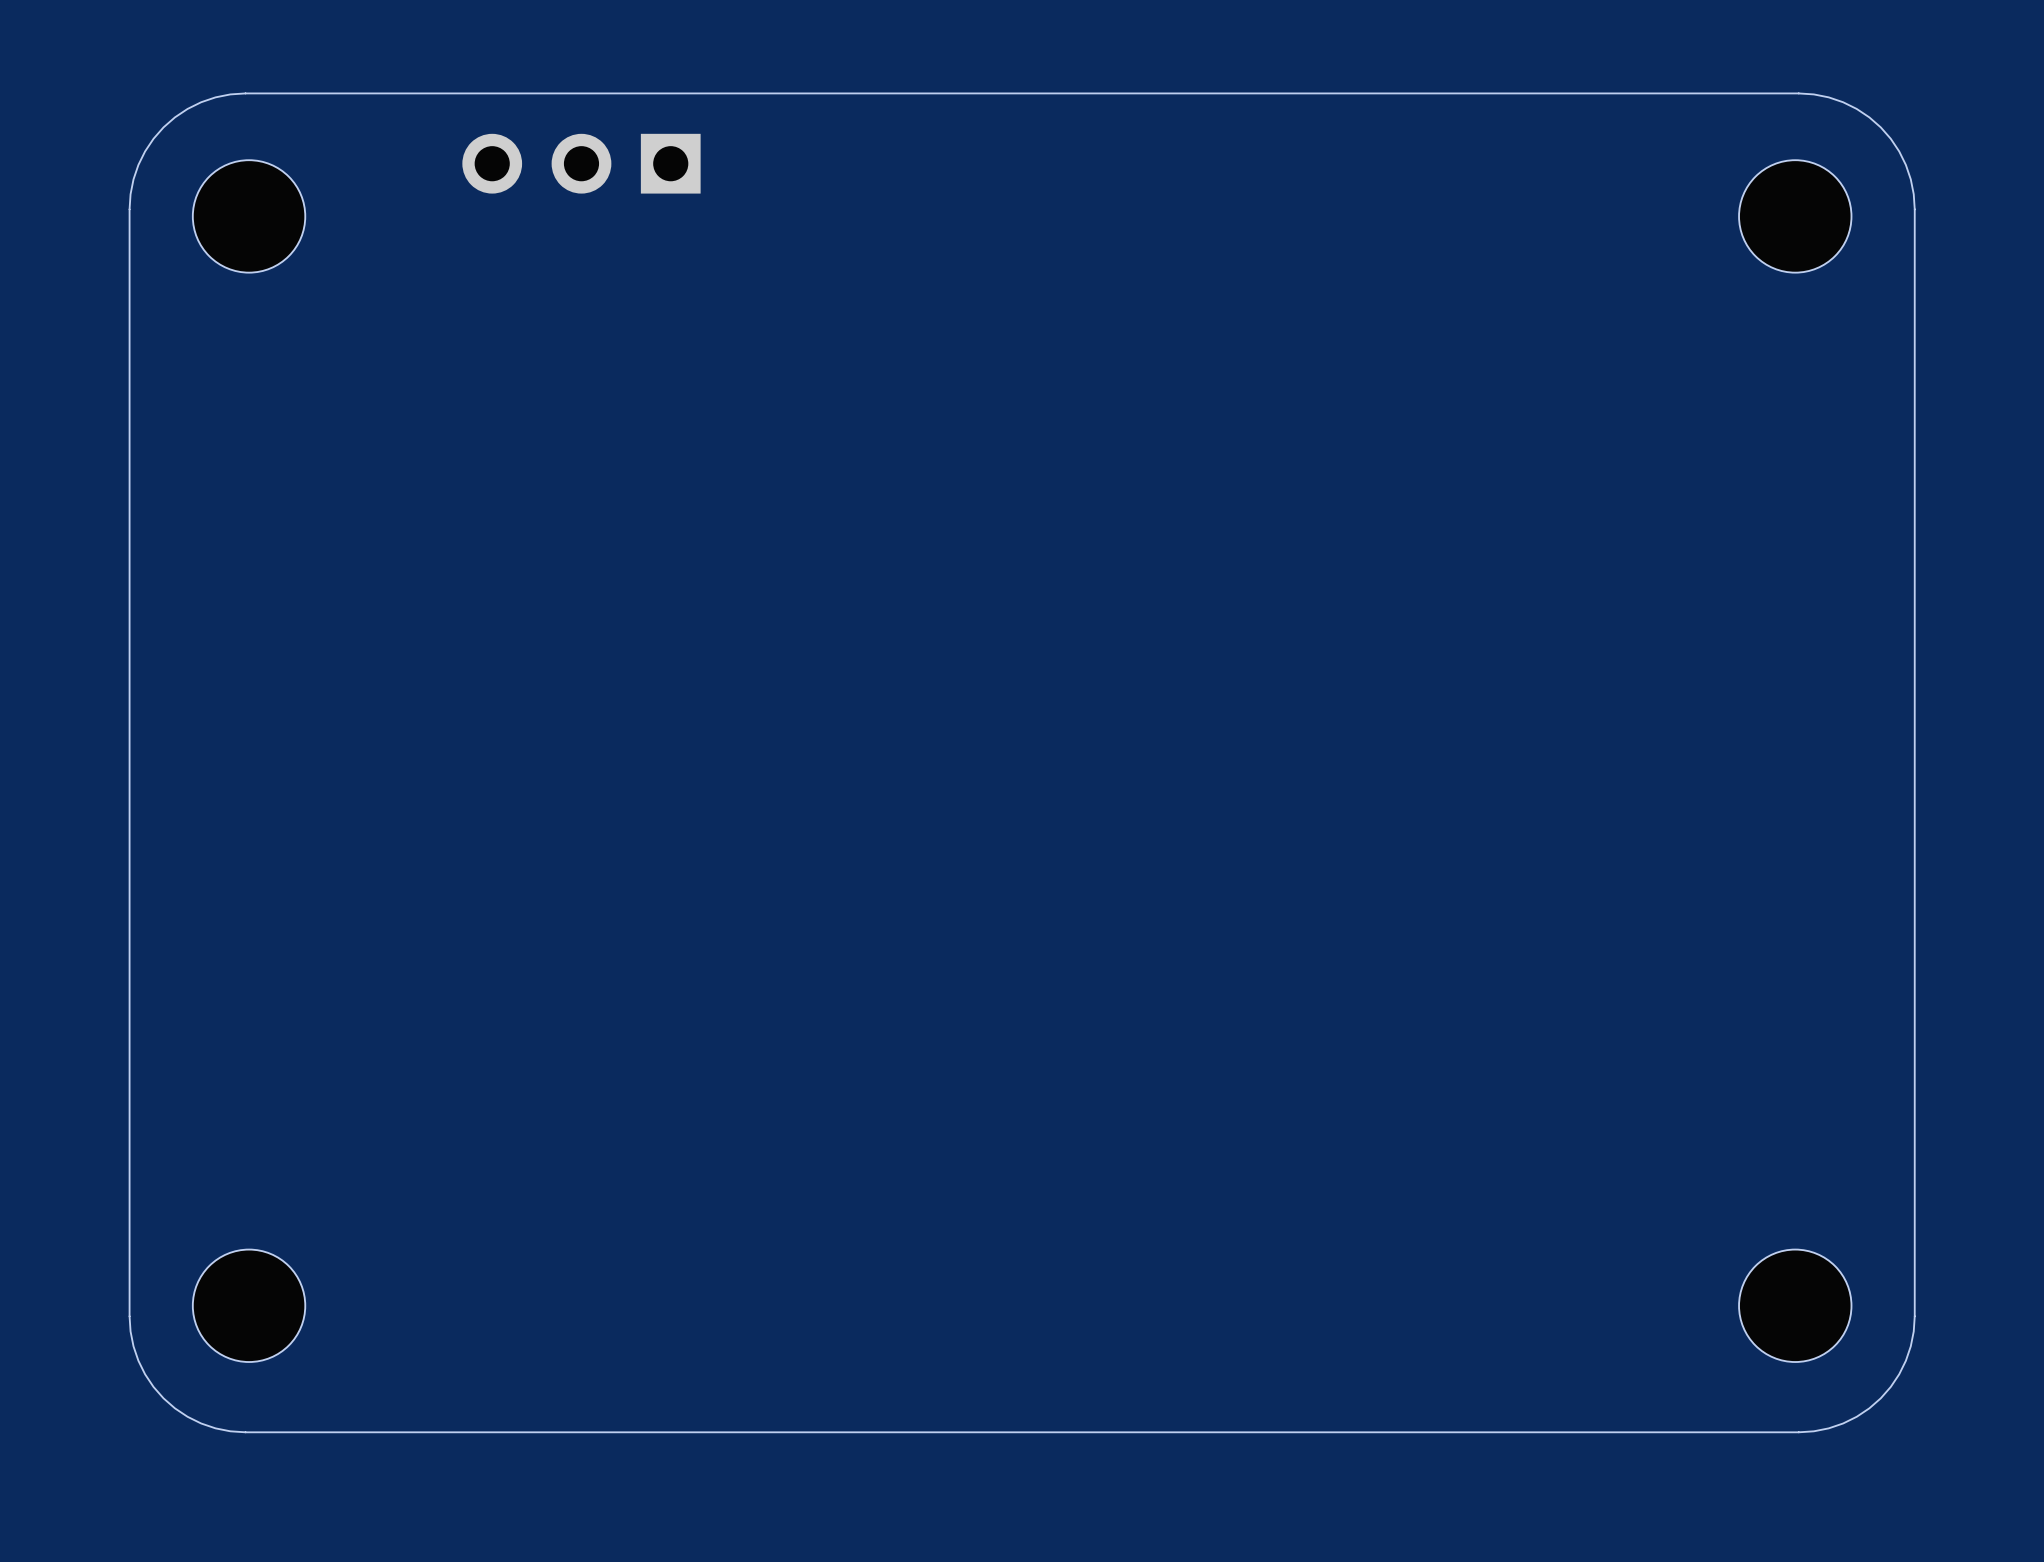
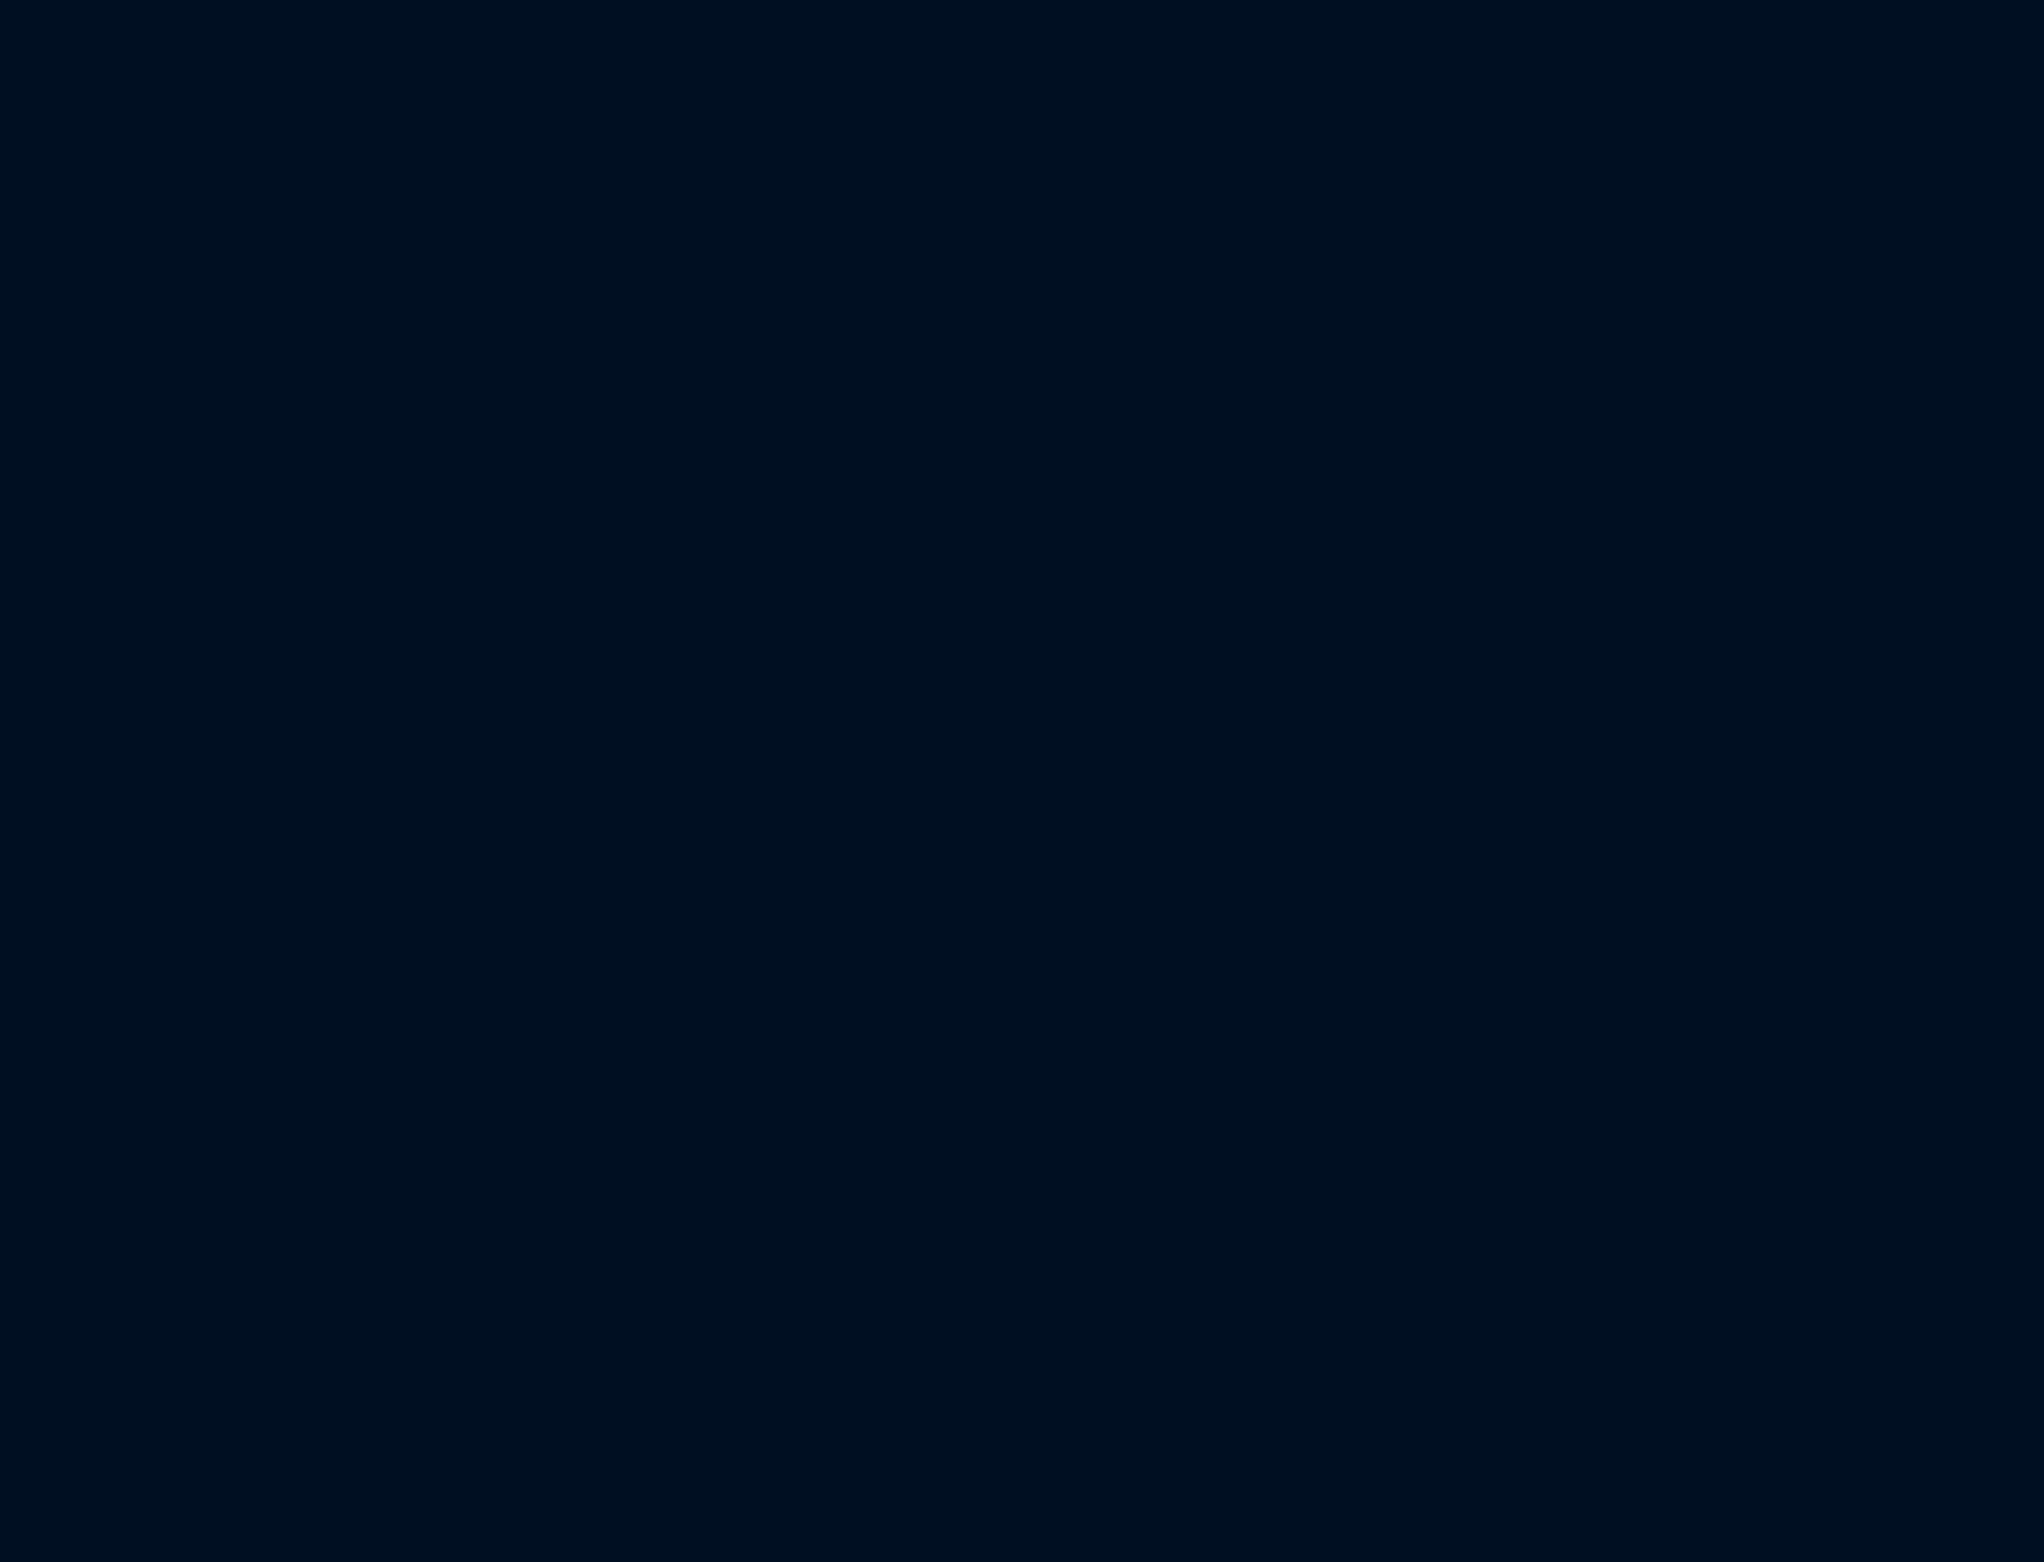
board edge: (1798, 93) (245, 93) (215, 97) (201, 102) (174, 117) (153, 138) (138, 165) (130, 194) (129, 209) (129, 1316) (130, 1331) (138, 1360) (153, 1386) (174, 1408) (187, 1416) (215, 1428) (245, 1432) (1798, 1432) (1828, 1428) (1856, 1416) (1869, 1408) (1890, 1386) (1905, 1360) (1913, 1331) (1914, 1316) (1914, 209) (1913, 194) (1905, 165) (1899, 151) (1880, 127) (1869, 117) (1843, 102) (1813, 94) (1798, 93) -> none
part: (581, 163) -> none
part: (249, 216) -> none
part: (1795, 216) -> none
part: (249, 1305) -> none
part: (1795, 1305) -> none

